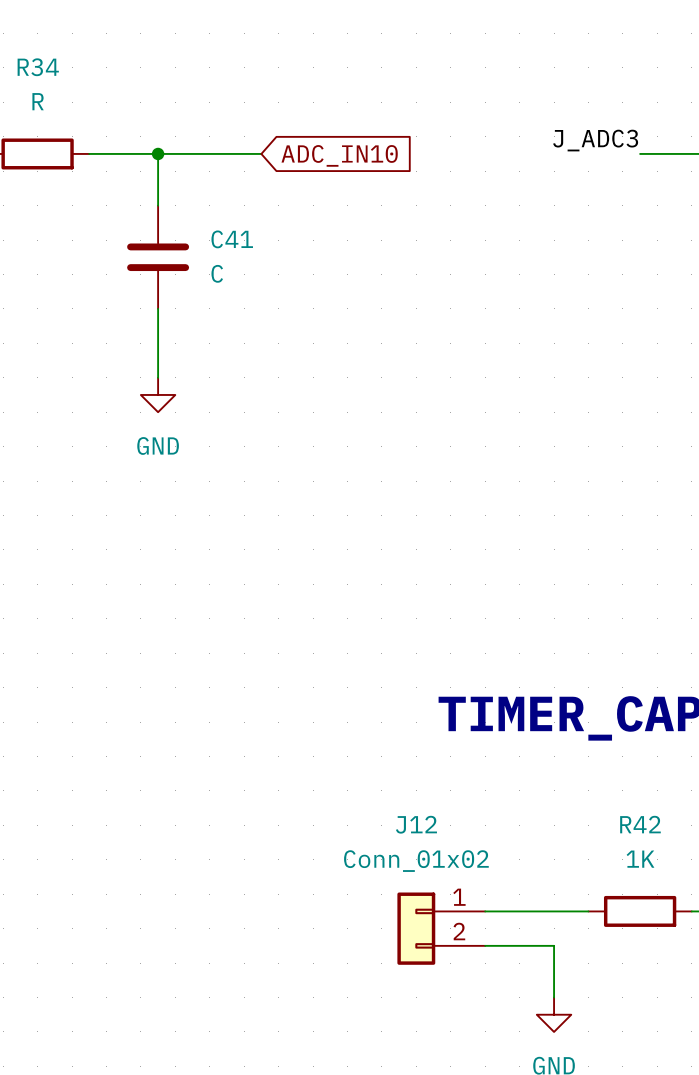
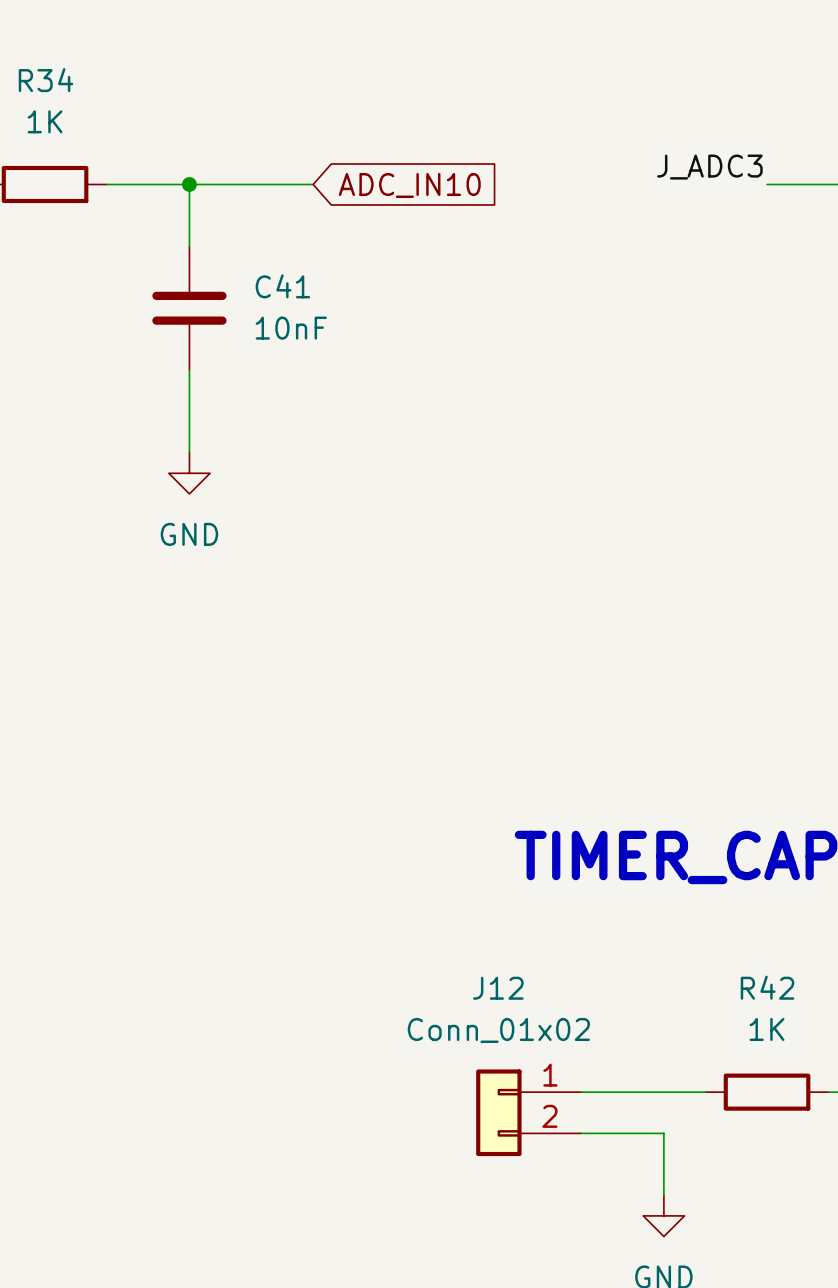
R34 value: R (38, 101) -> 1K (45, 121)
C41 value: C (217, 273) -> 10nF (291, 328)

